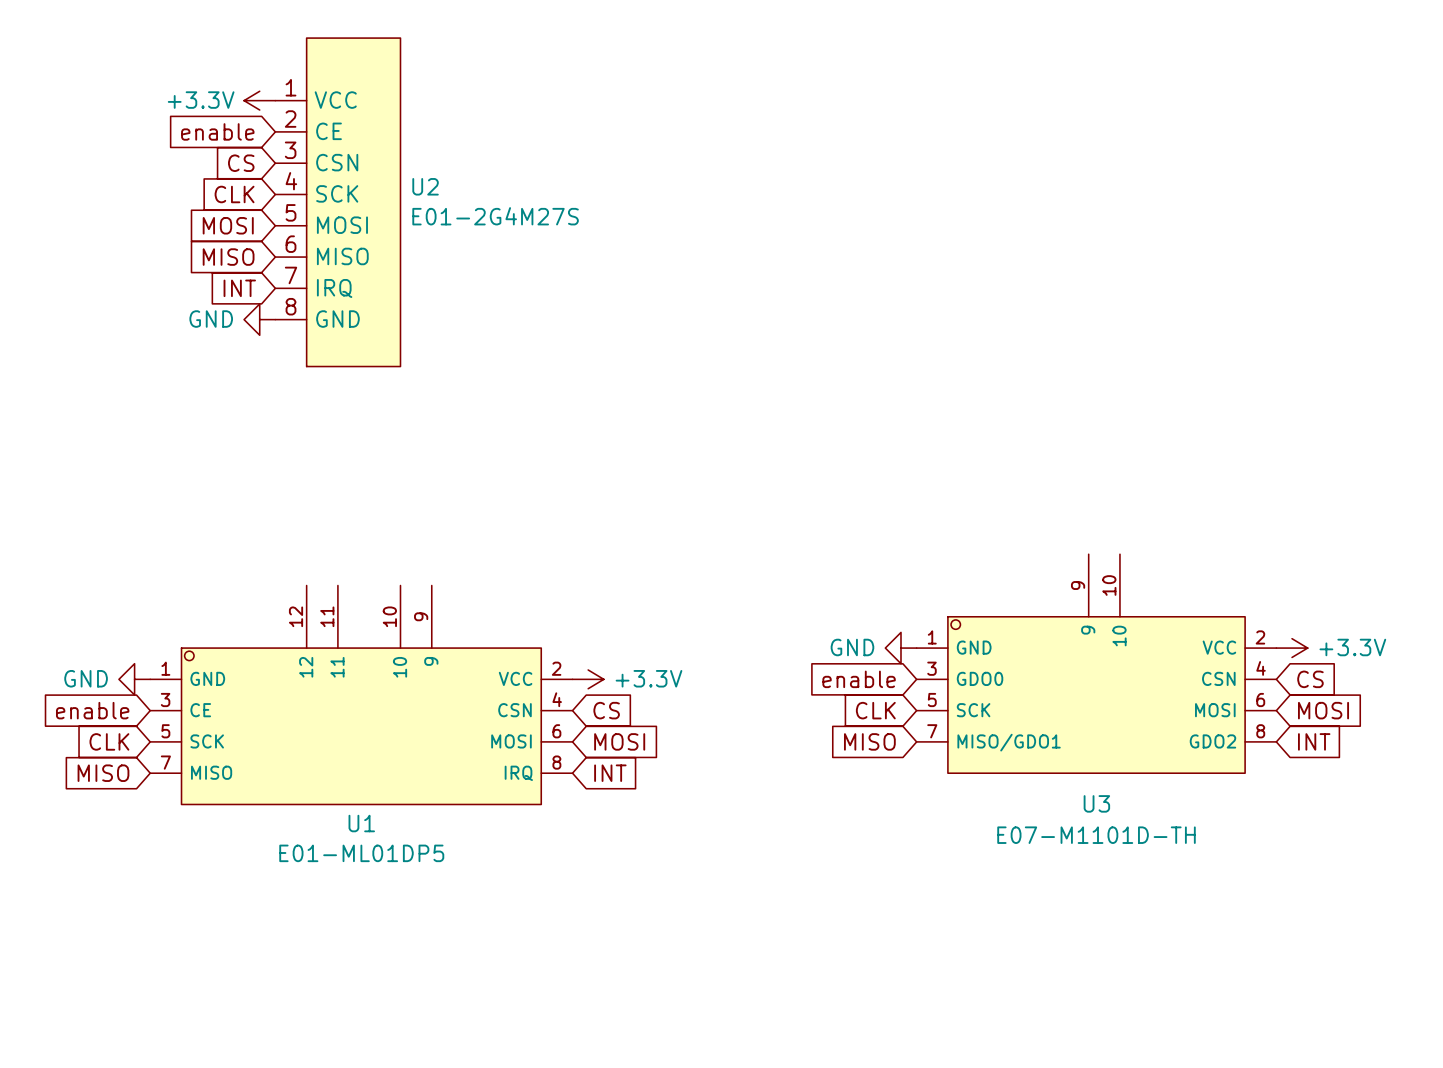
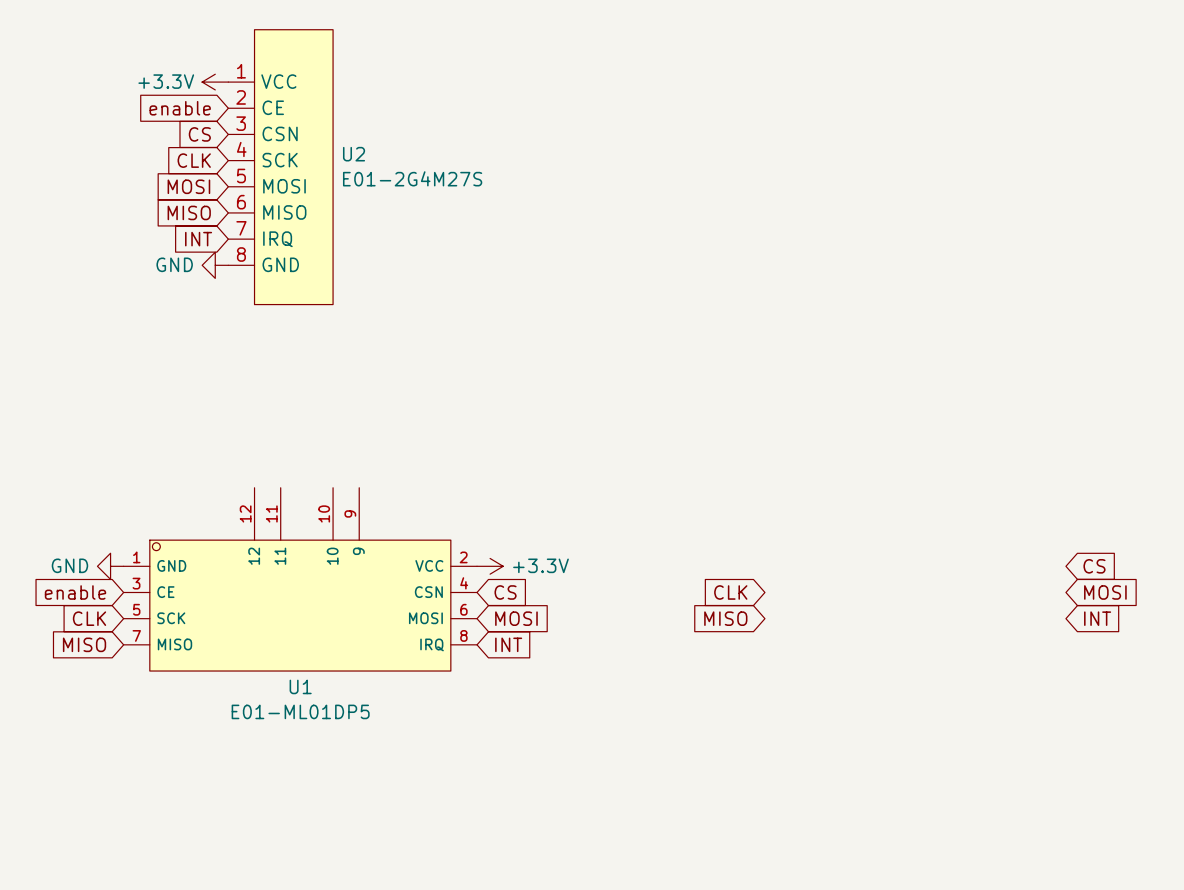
power symbol: GND (900, 648) -> none
power symbol: +3.3V (1292, 648) -> none
U3: E07-M1101D-TH (1096, 663) -> none
global label: enable (859, 679) -> none

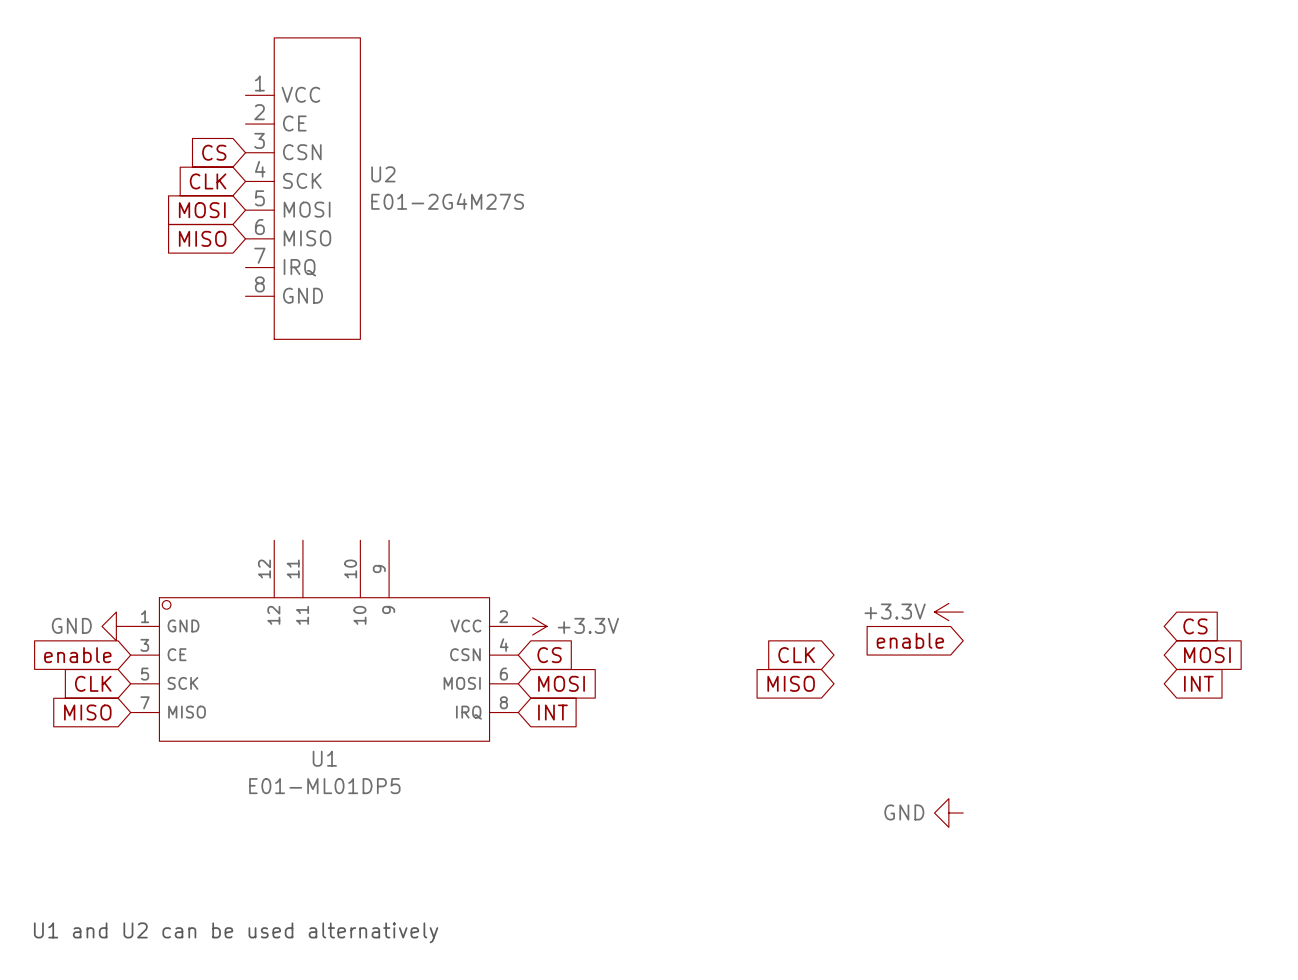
power symbol: +3.3V (215, 82) -> none
global label: enable (180, 108) -> none
global label: INT (198, 239) -> none
power symbol: GND (215, 265) -> none
power symbol: none -> +3.3V (948, 612)
global label: none -> enable (910, 640)
power symbol: none -> GND (948, 813)
text: none -> U1 and U2 can be used alternatively (236, 932)

